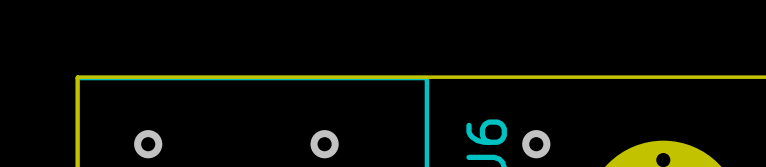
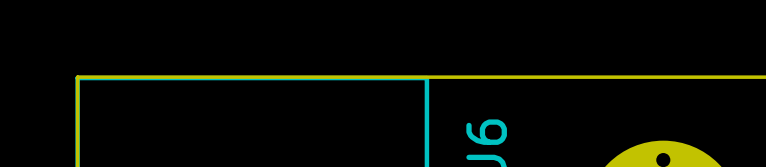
via: (148, 144) -> none
via: (324, 144) -> none
via: (536, 144) -> none

